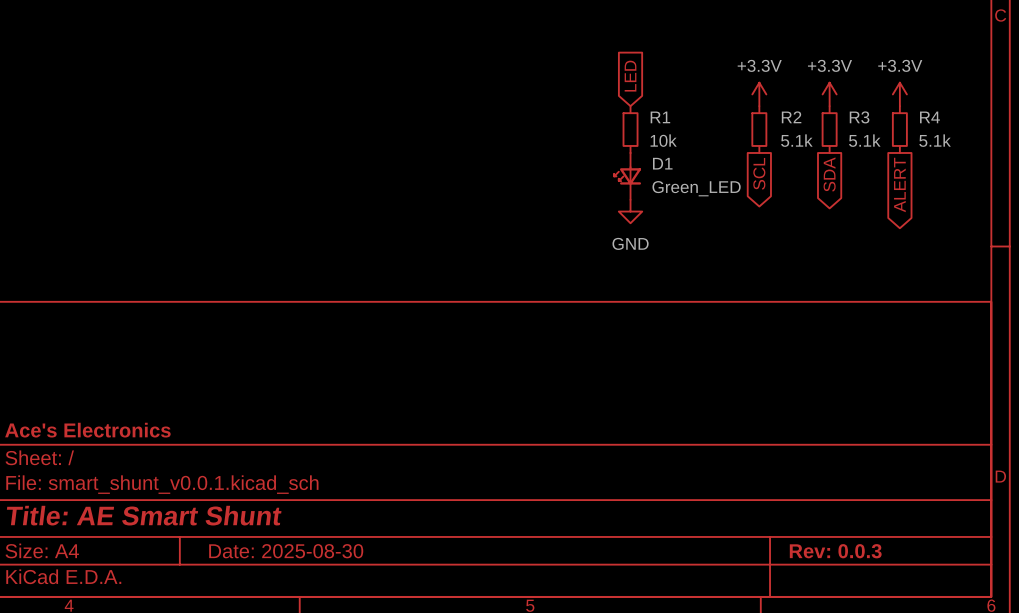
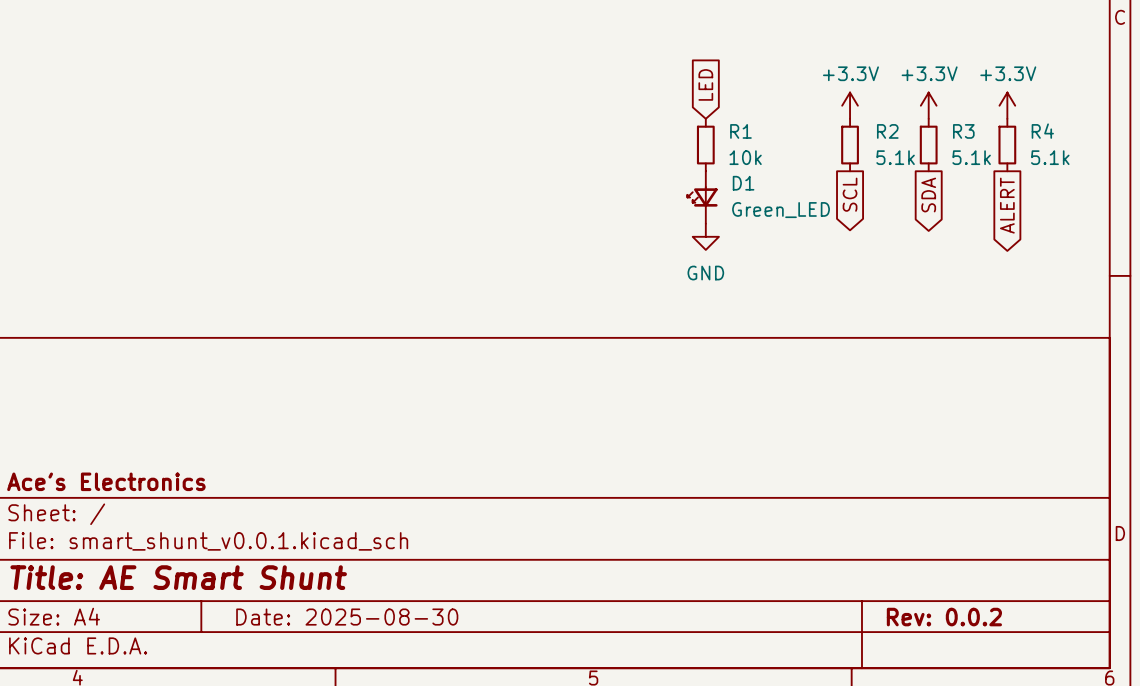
title block: Rev: 0.0.3 (835, 551) -> Rev: 0.0.2 (944, 617)

